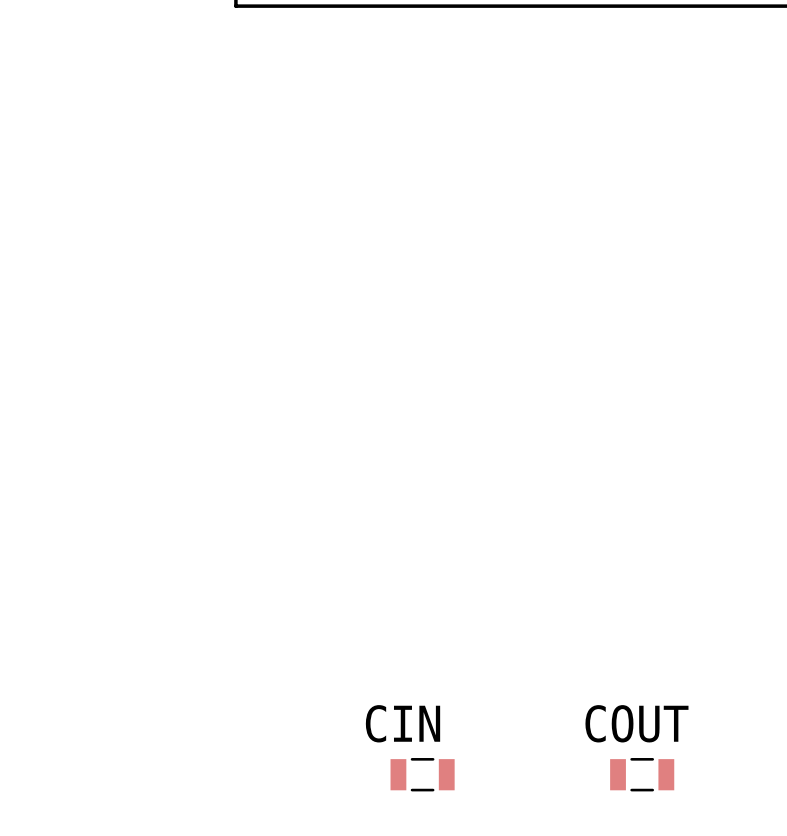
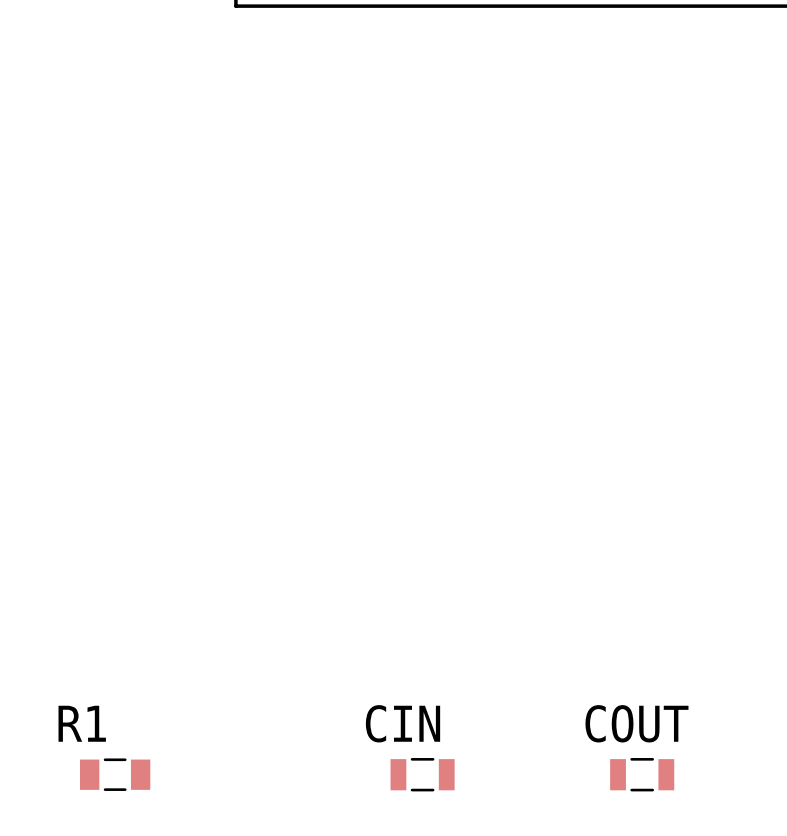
R1: none -> (115, 774)

